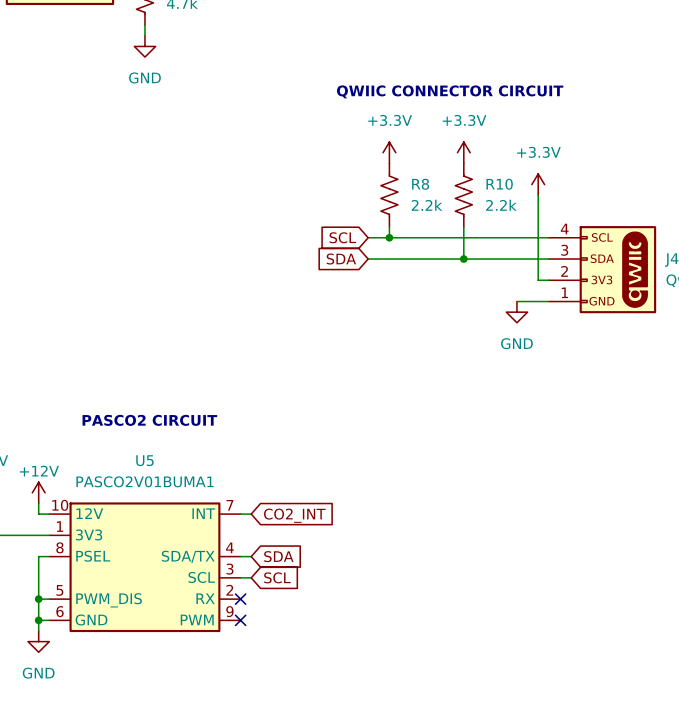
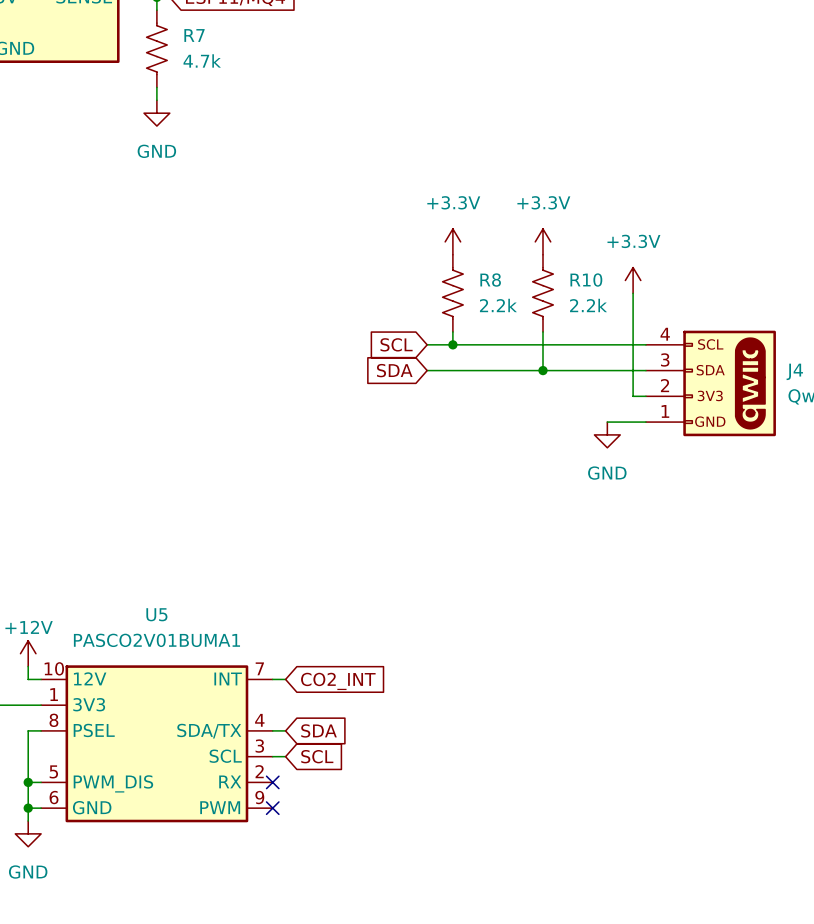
text: QWIIC CONNECTOR CIRCUIT (450, 91) -> none
text: PASCO2 CIRCUIT (149, 420) -> none

